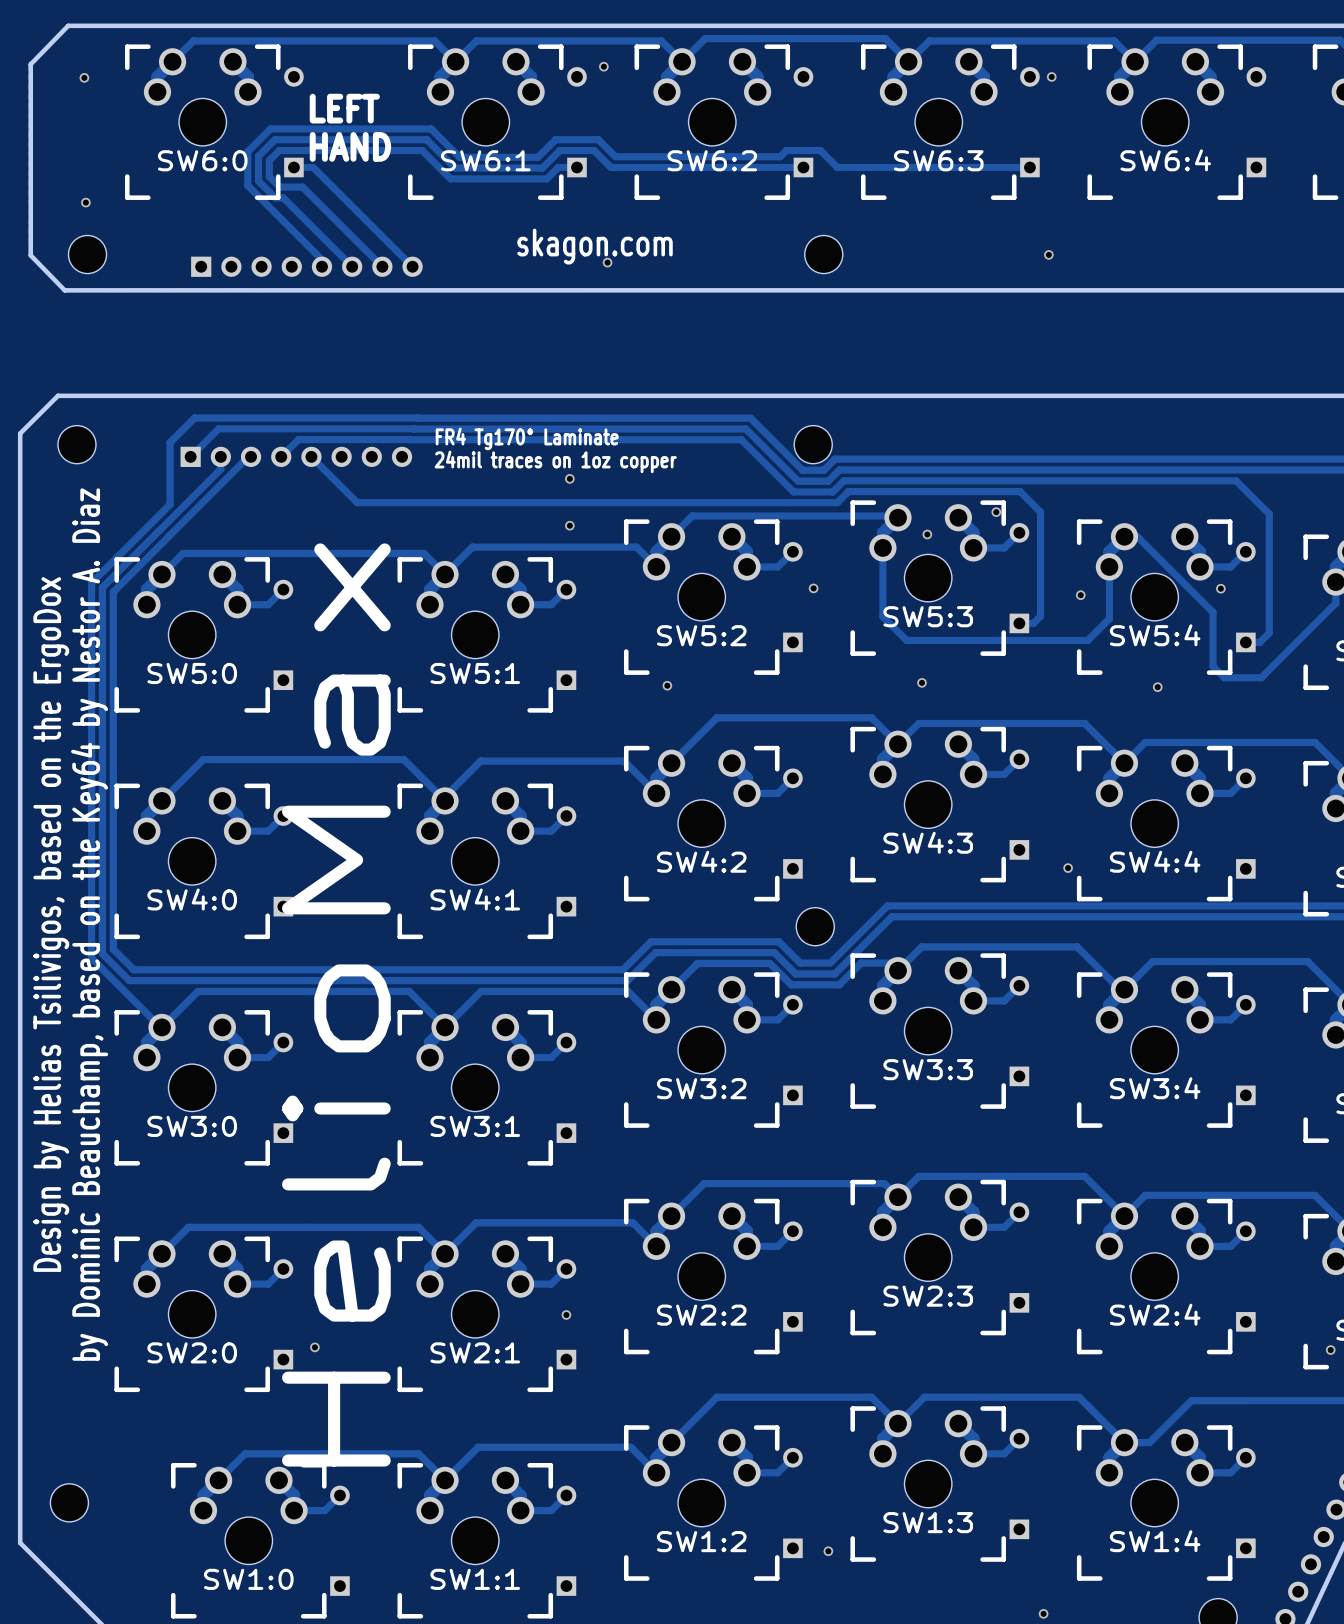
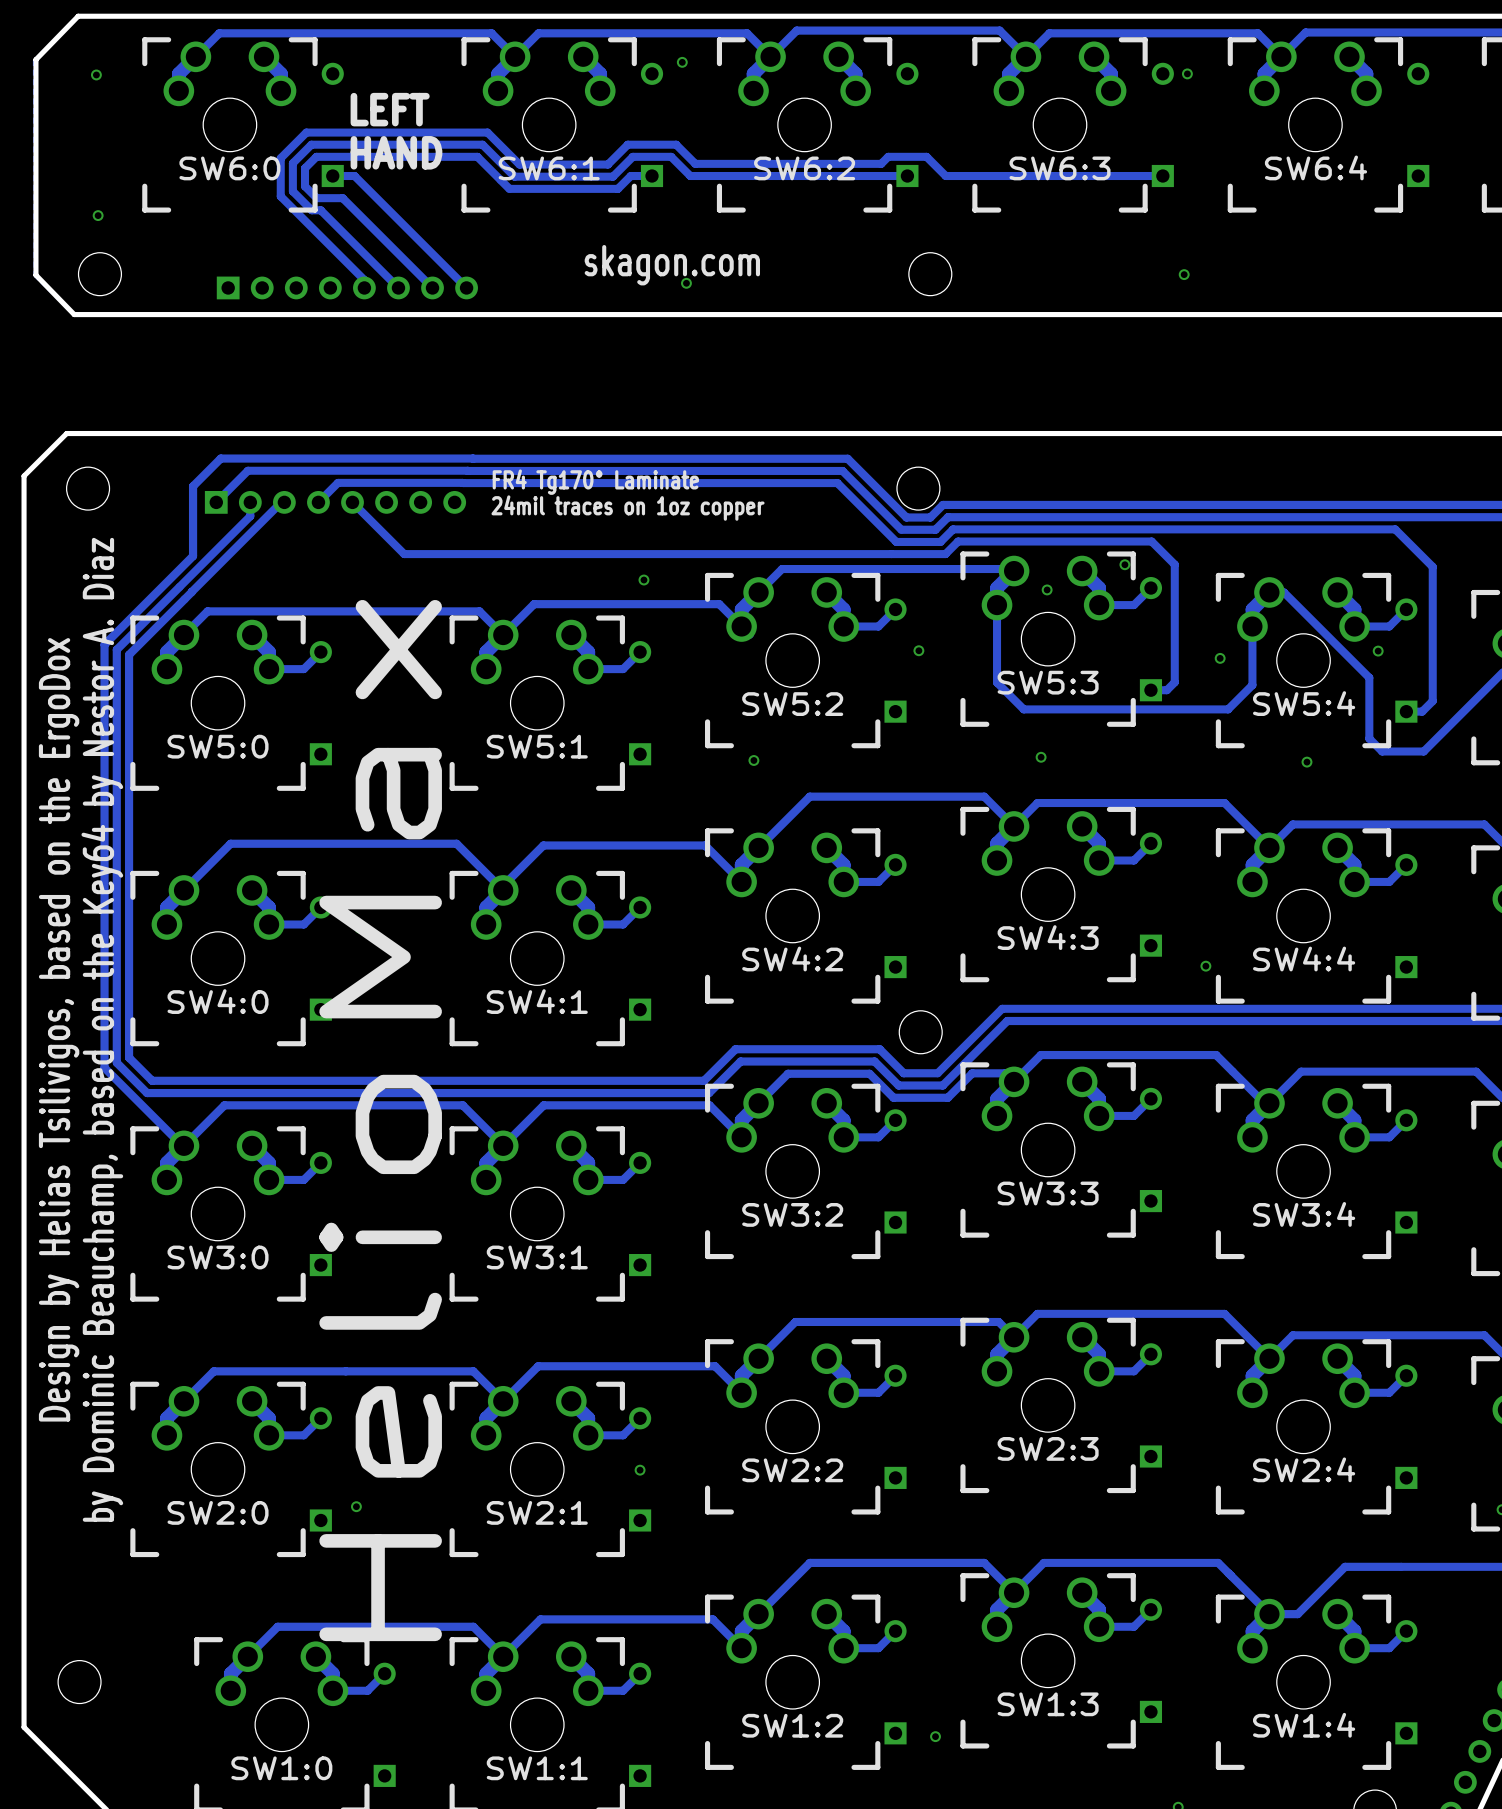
via: (569, 478) -> none

